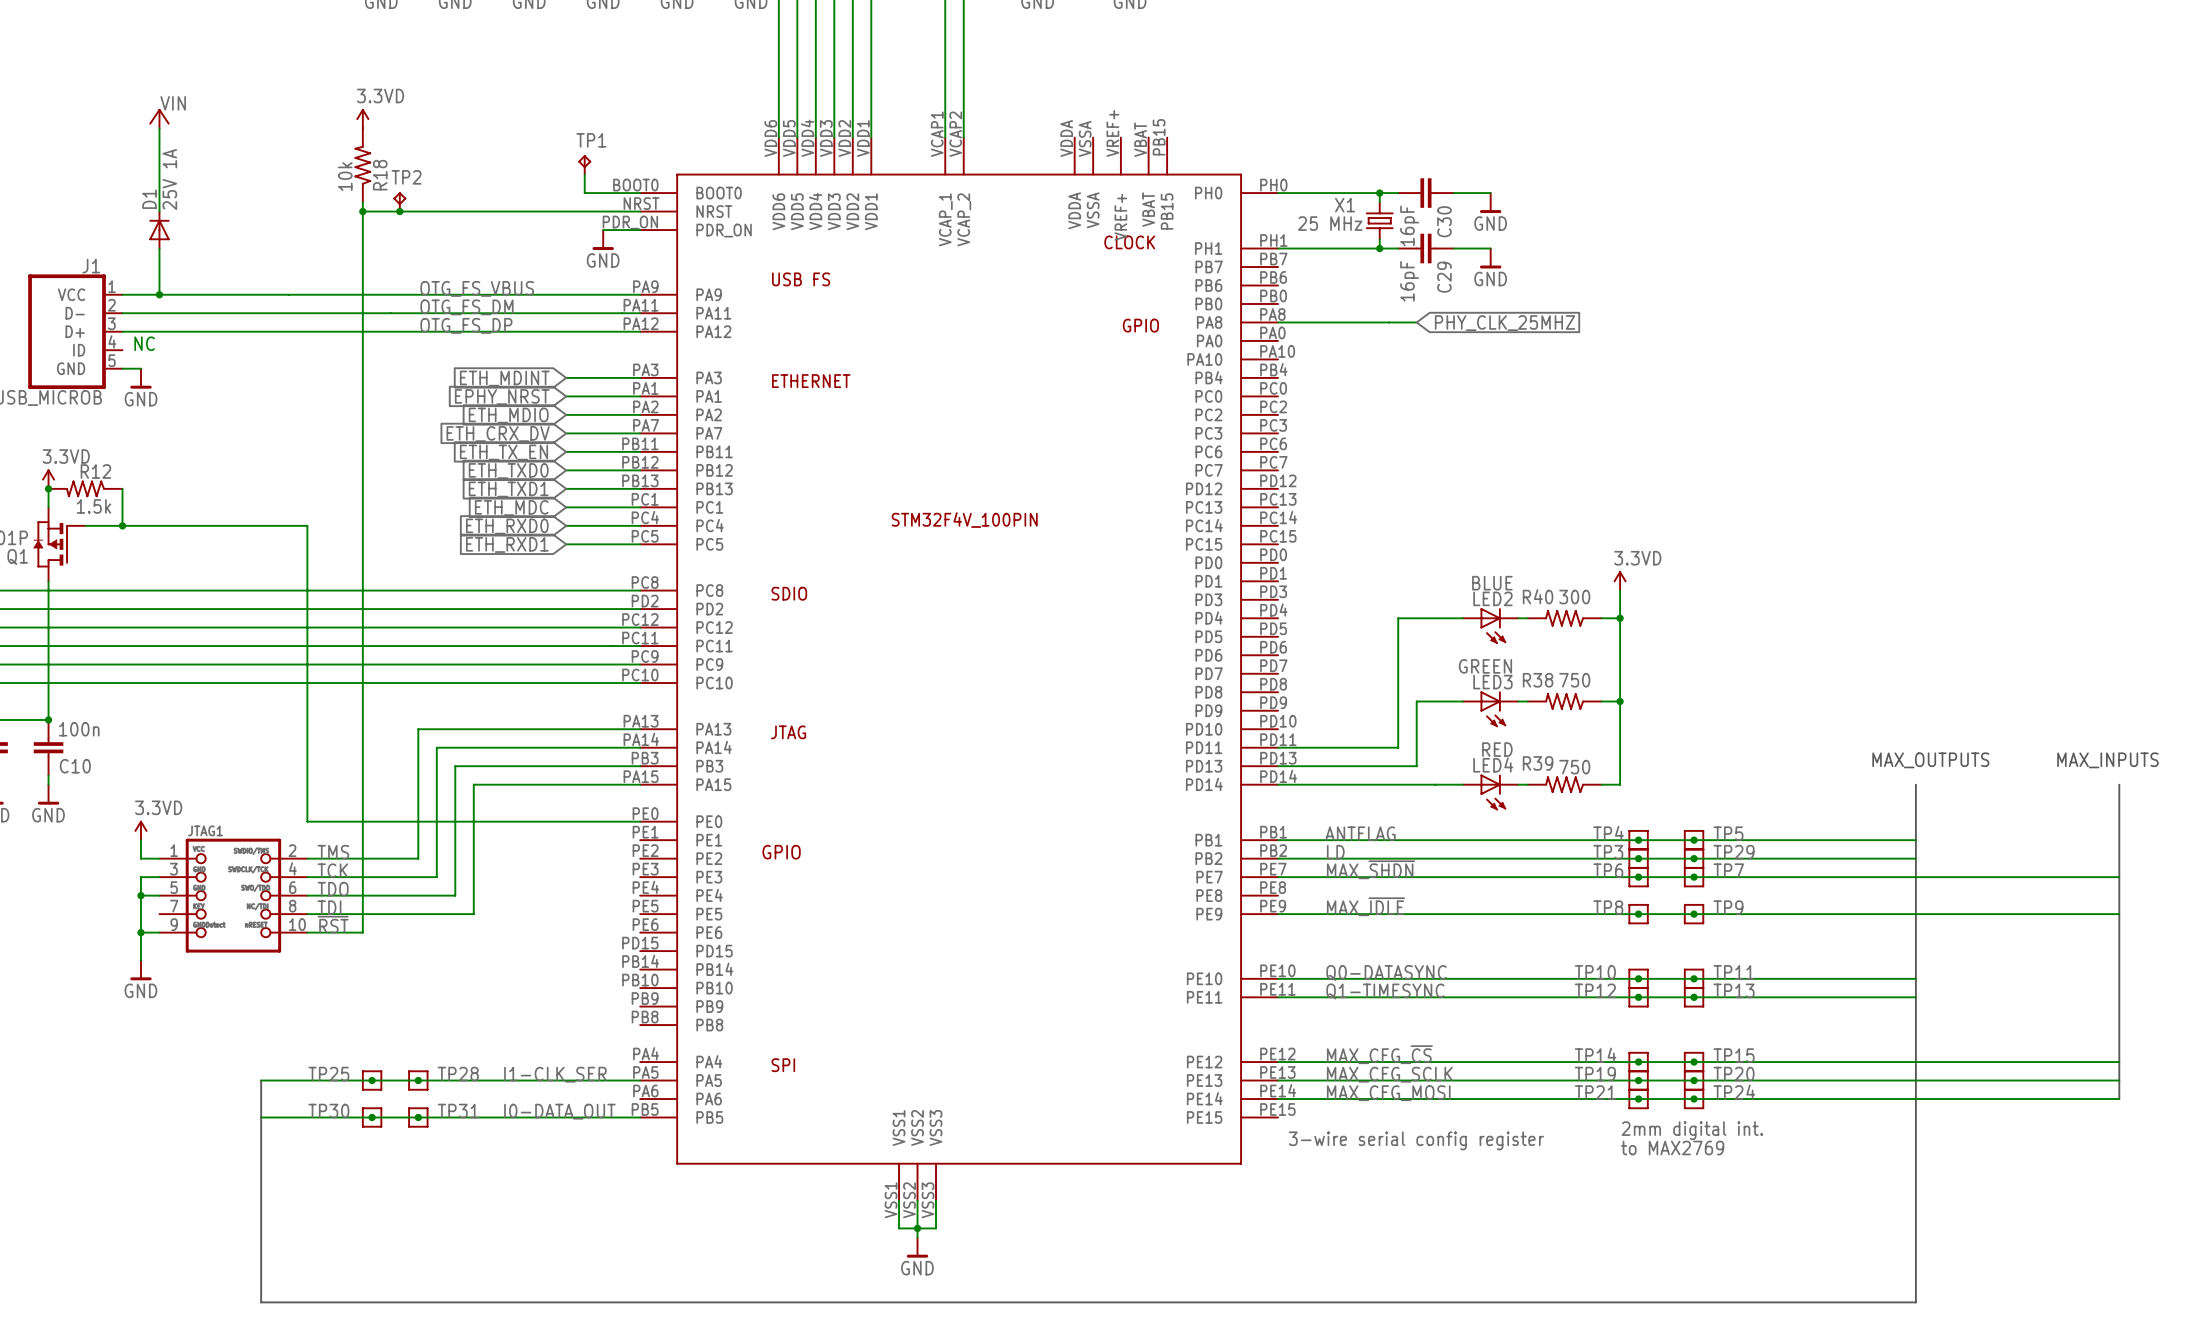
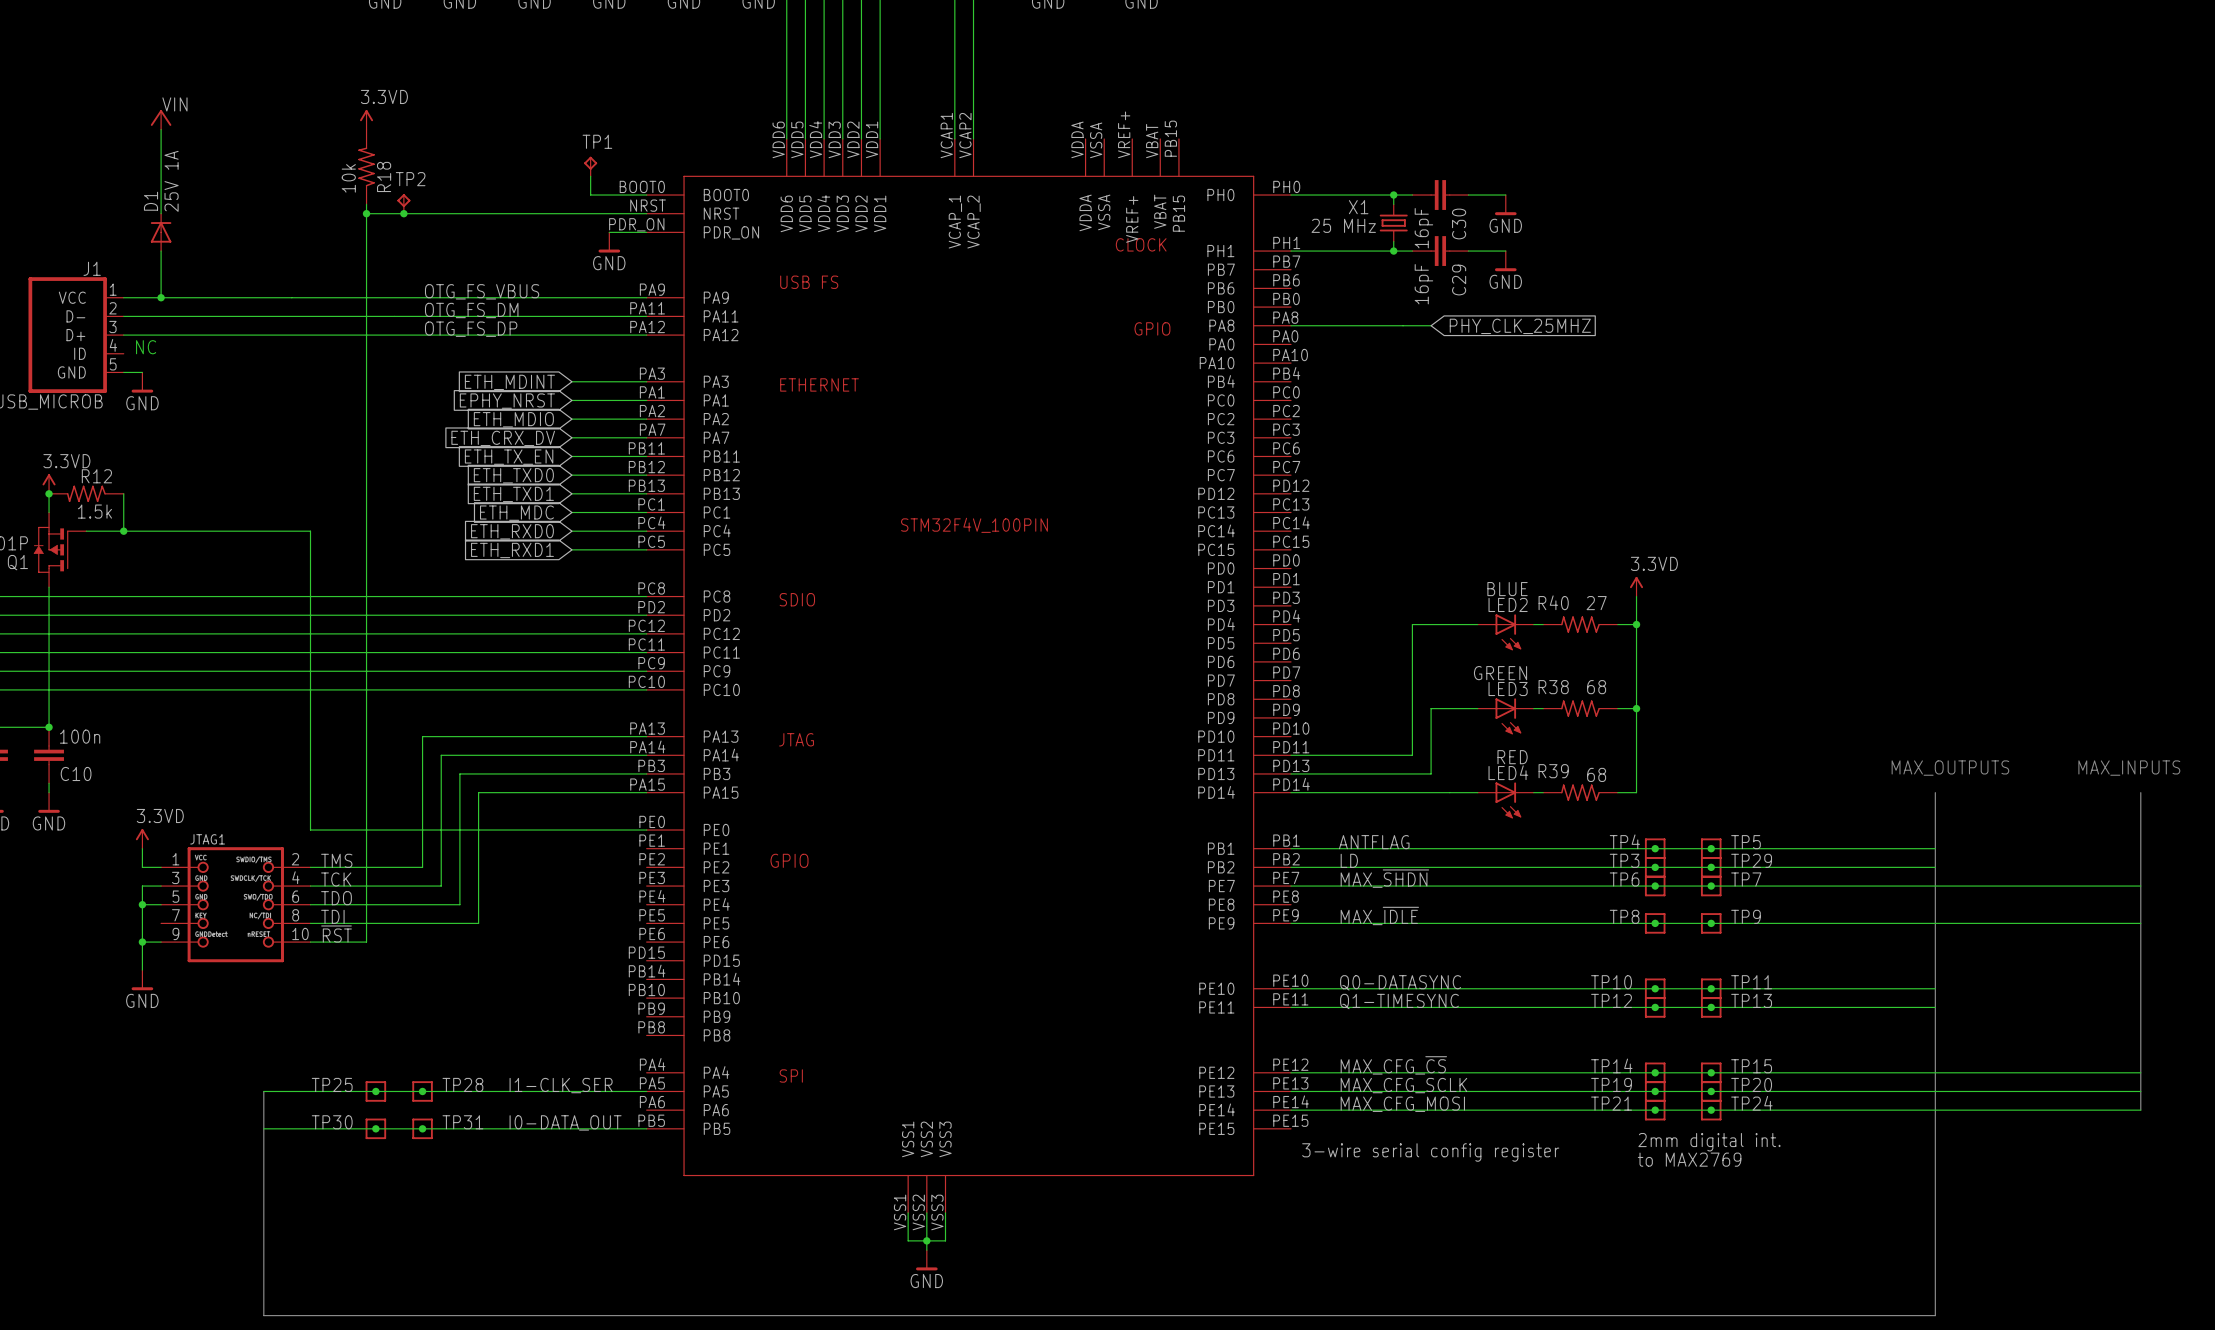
R40 value: 300 (1574, 597) -> 27 (1596, 603)
R38 value: 750 (1574, 680) -> 68 (1596, 687)
R39 value: 750 (1574, 767) -> 68 (1596, 774)

